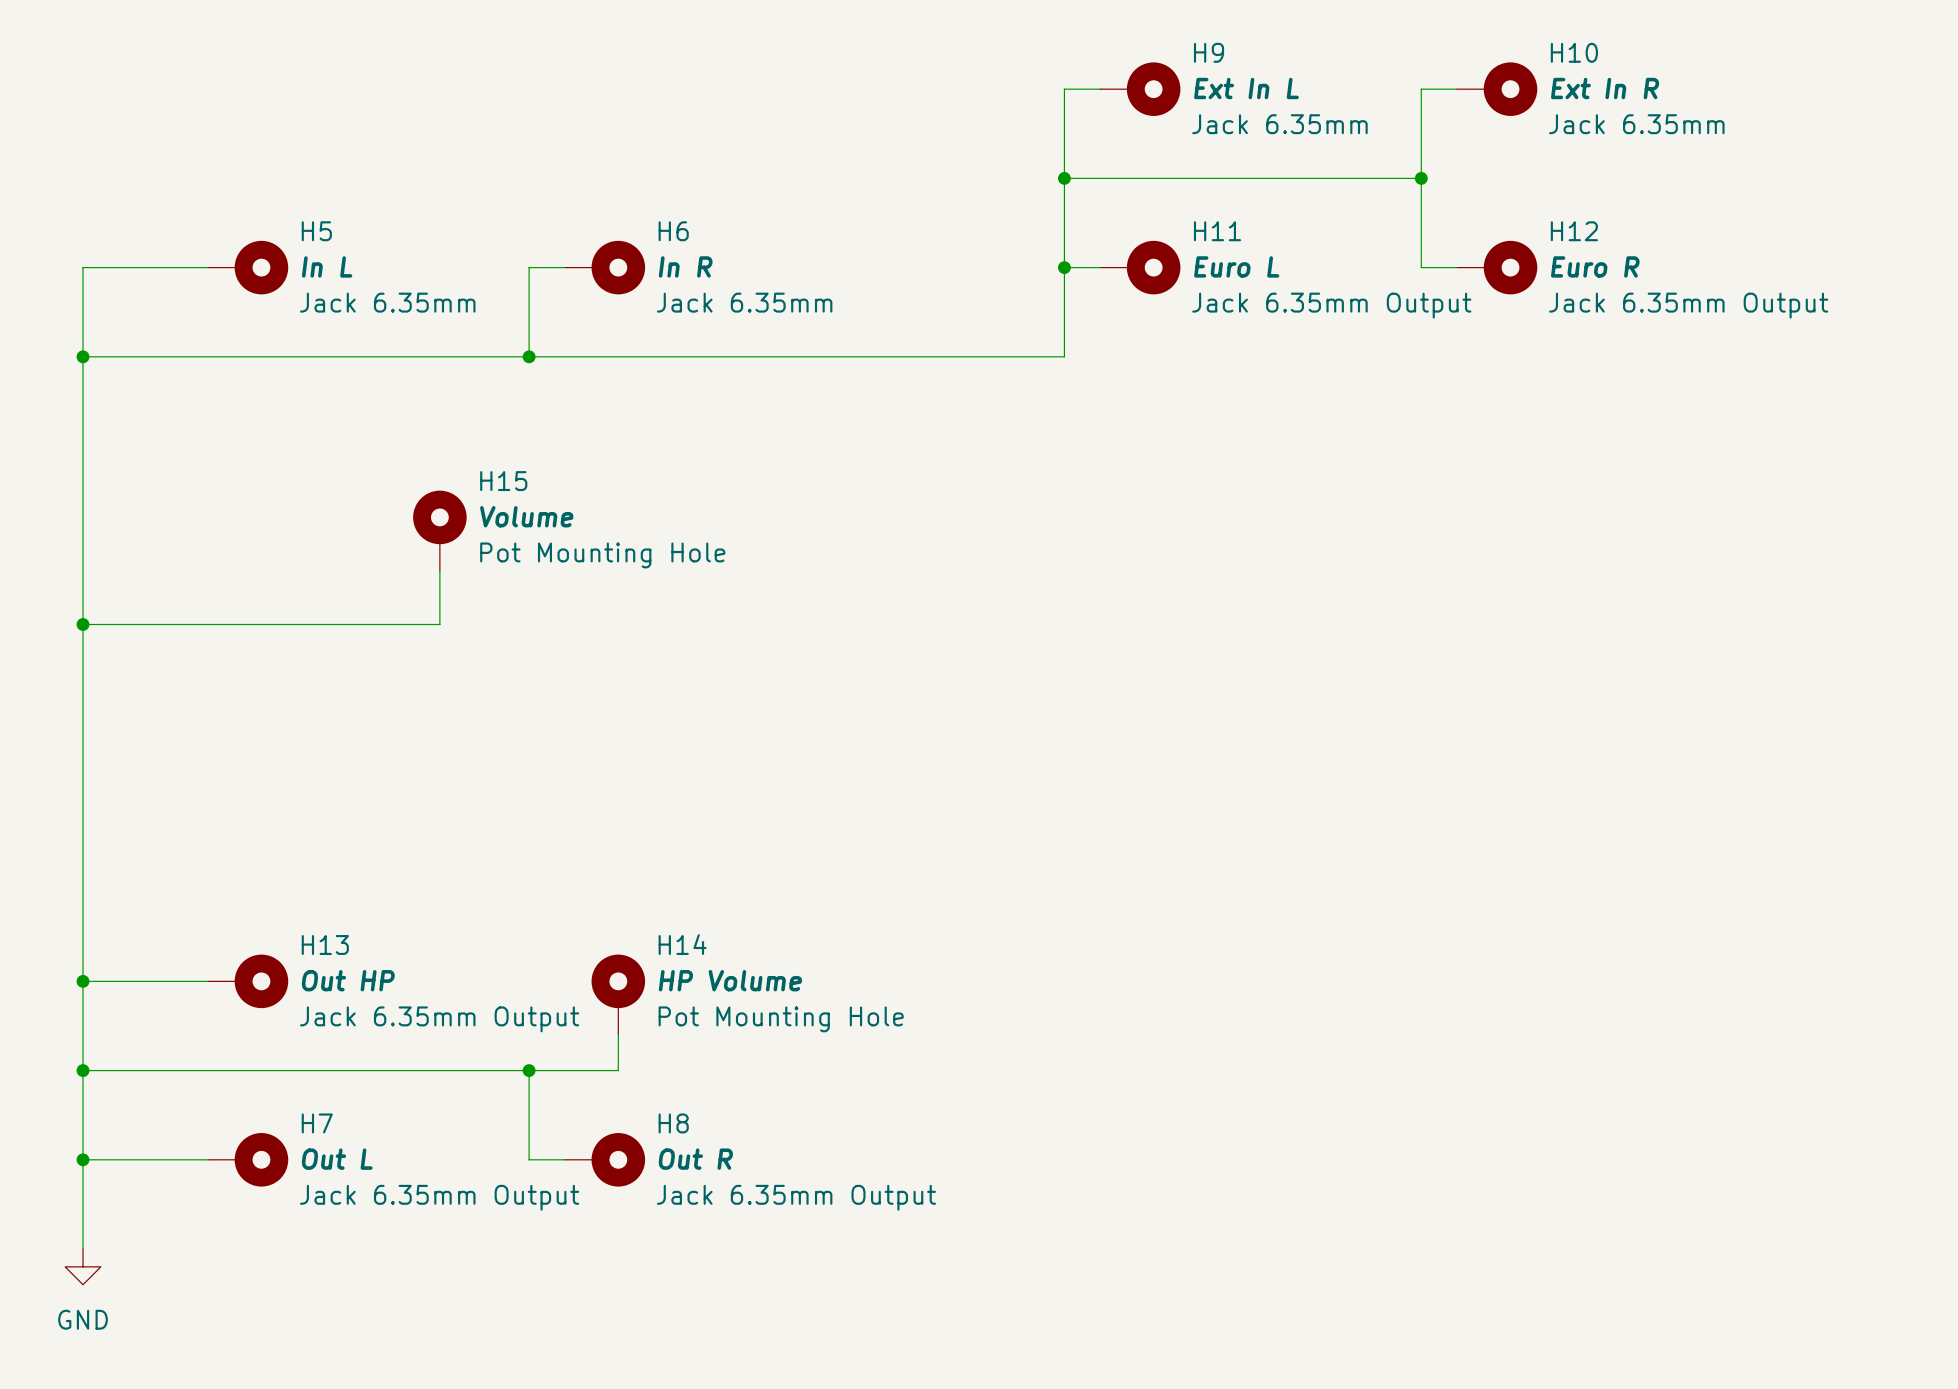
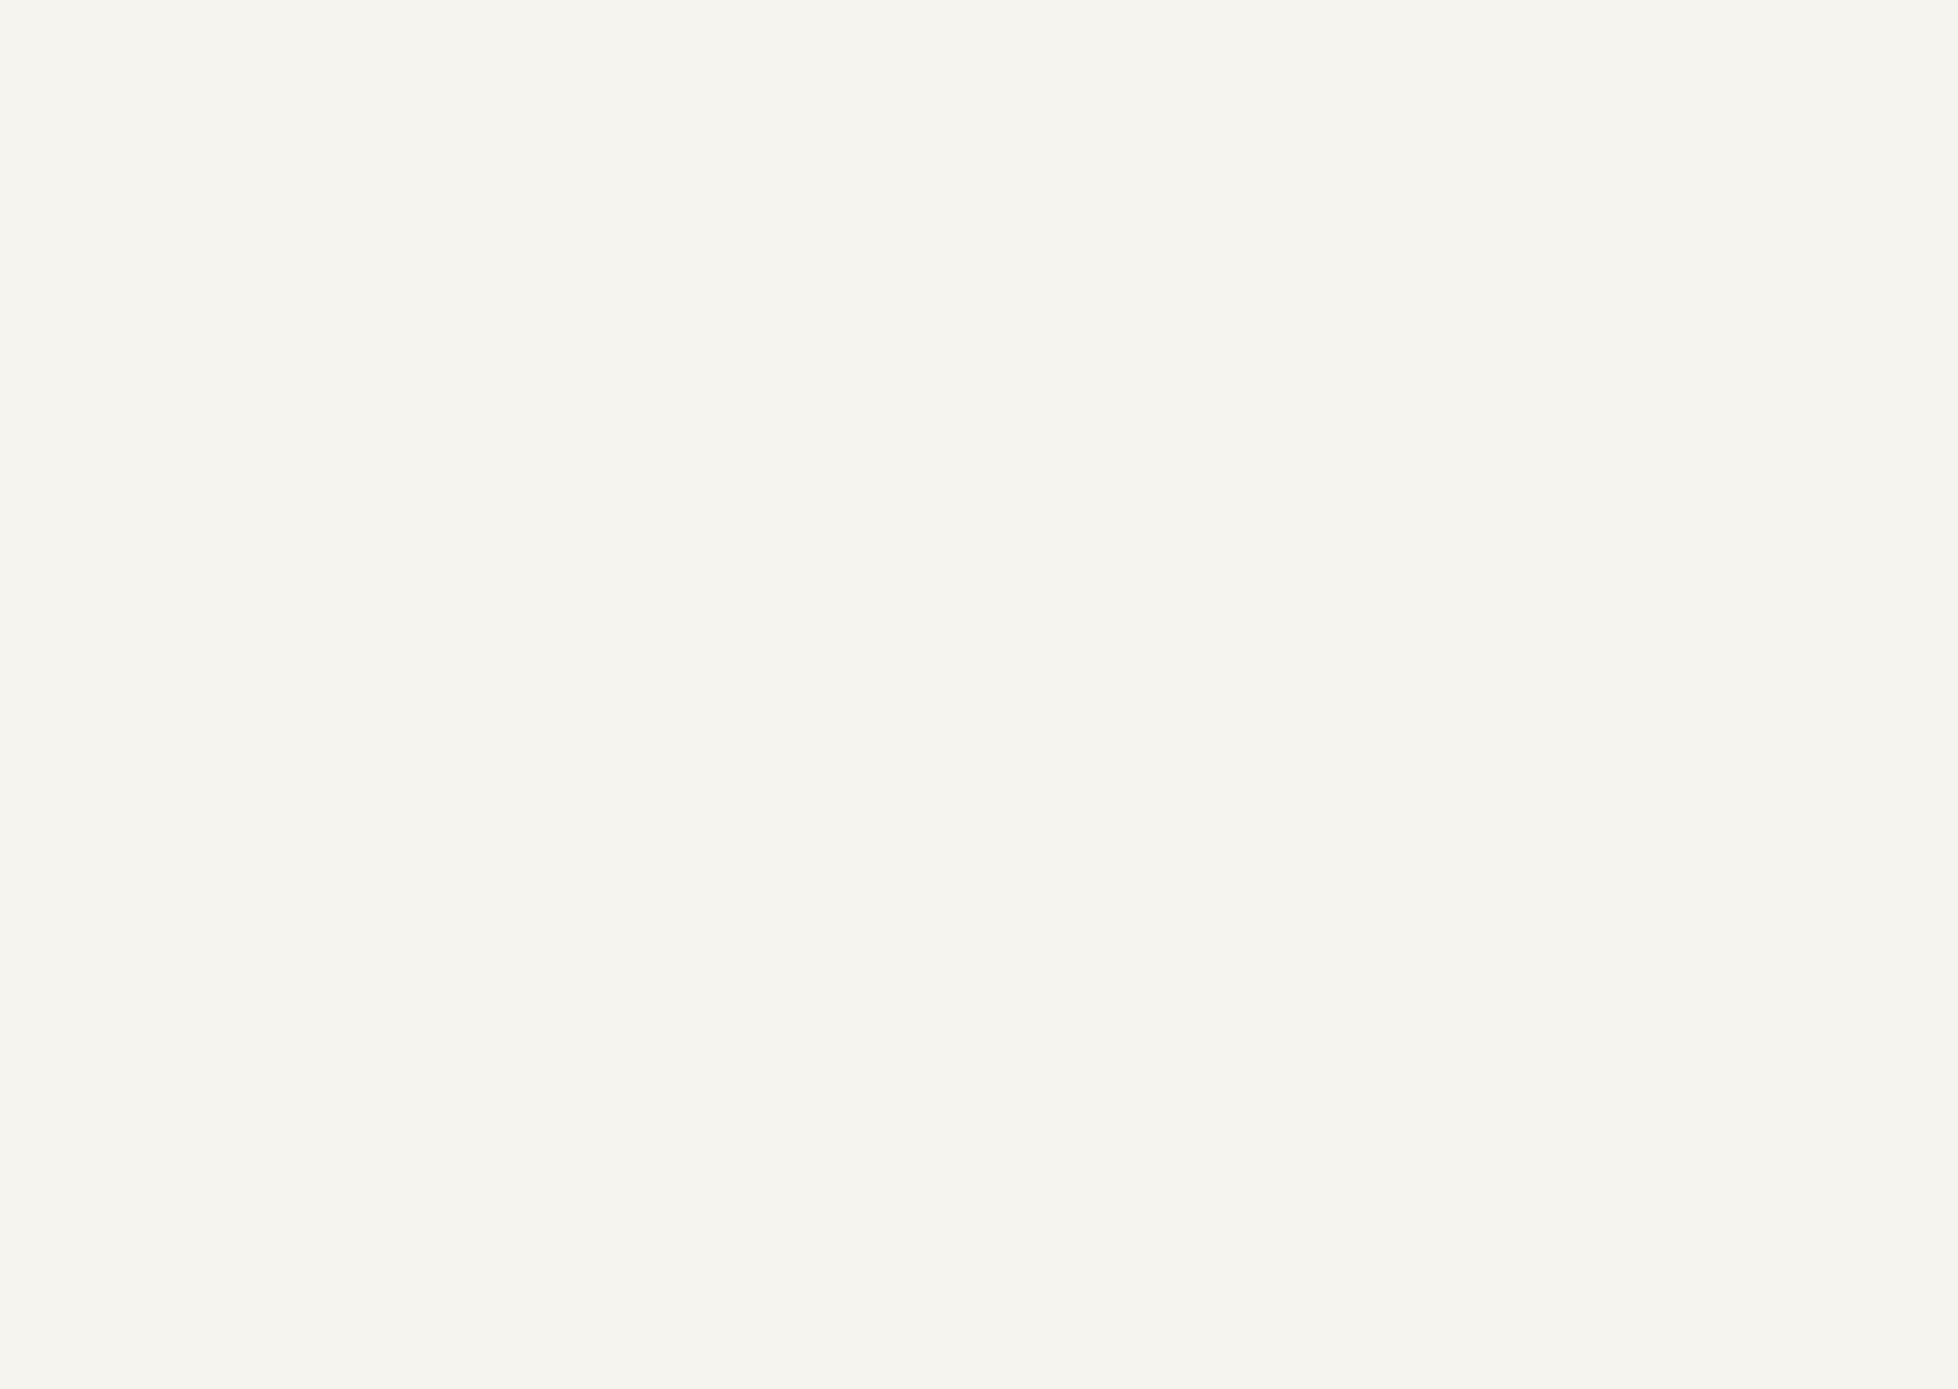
wire: (1100, 89) (1064, 89) (1064, 356) (83, 356) -> none
H9: Ext In L (1140, 89) -> none
wire: (1456, 89) (1421, 89) (1421, 267) (1456, 267) -> none
H10: Ext In R (1497, 89) -> none
wire: (1064, 178) (1421, 178) -> none
junction: (1064, 178) -> none
junction: (1421, 178) -> none
wire: (207, 267) (83, 267) (83, 1249) -> none
H5: In L (248, 267) -> none
wire: (564, 267) (529, 267) (529, 356) -> none
H6: In R (604, 267) -> none
wire: (1064, 267) (1100, 267) -> none
junction: (1064, 267) -> none
H11: Euro L (1140, 267) -> none
H12: Euro R (1497, 267) -> none
junction: (83, 356) -> none
junction: (529, 356) -> none
H15: Volume (439, 530) -> none
wire: (439, 570) (439, 624) (83, 624) -> none
junction: (83, 624) -> none
wire: (83, 981) (207, 981) -> none
junction: (83, 981) -> none
H13: Out HP (248, 981) -> none
H14: HP Volume (618, 994) -> none
wire: (618, 1034) (618, 1070) (83, 1070) -> none
junction: (83, 1070) -> none
wire: (529, 1070) (529, 1159) (564, 1159) -> none
junction: (529, 1070) -> none
wire: (83, 1159) (207, 1159) -> none
junction: (83, 1159) -> none
H7: Out L (248, 1159) -> none
H8: Out R (604, 1159) -> none
power symbol: GND (83, 1266) -> none

